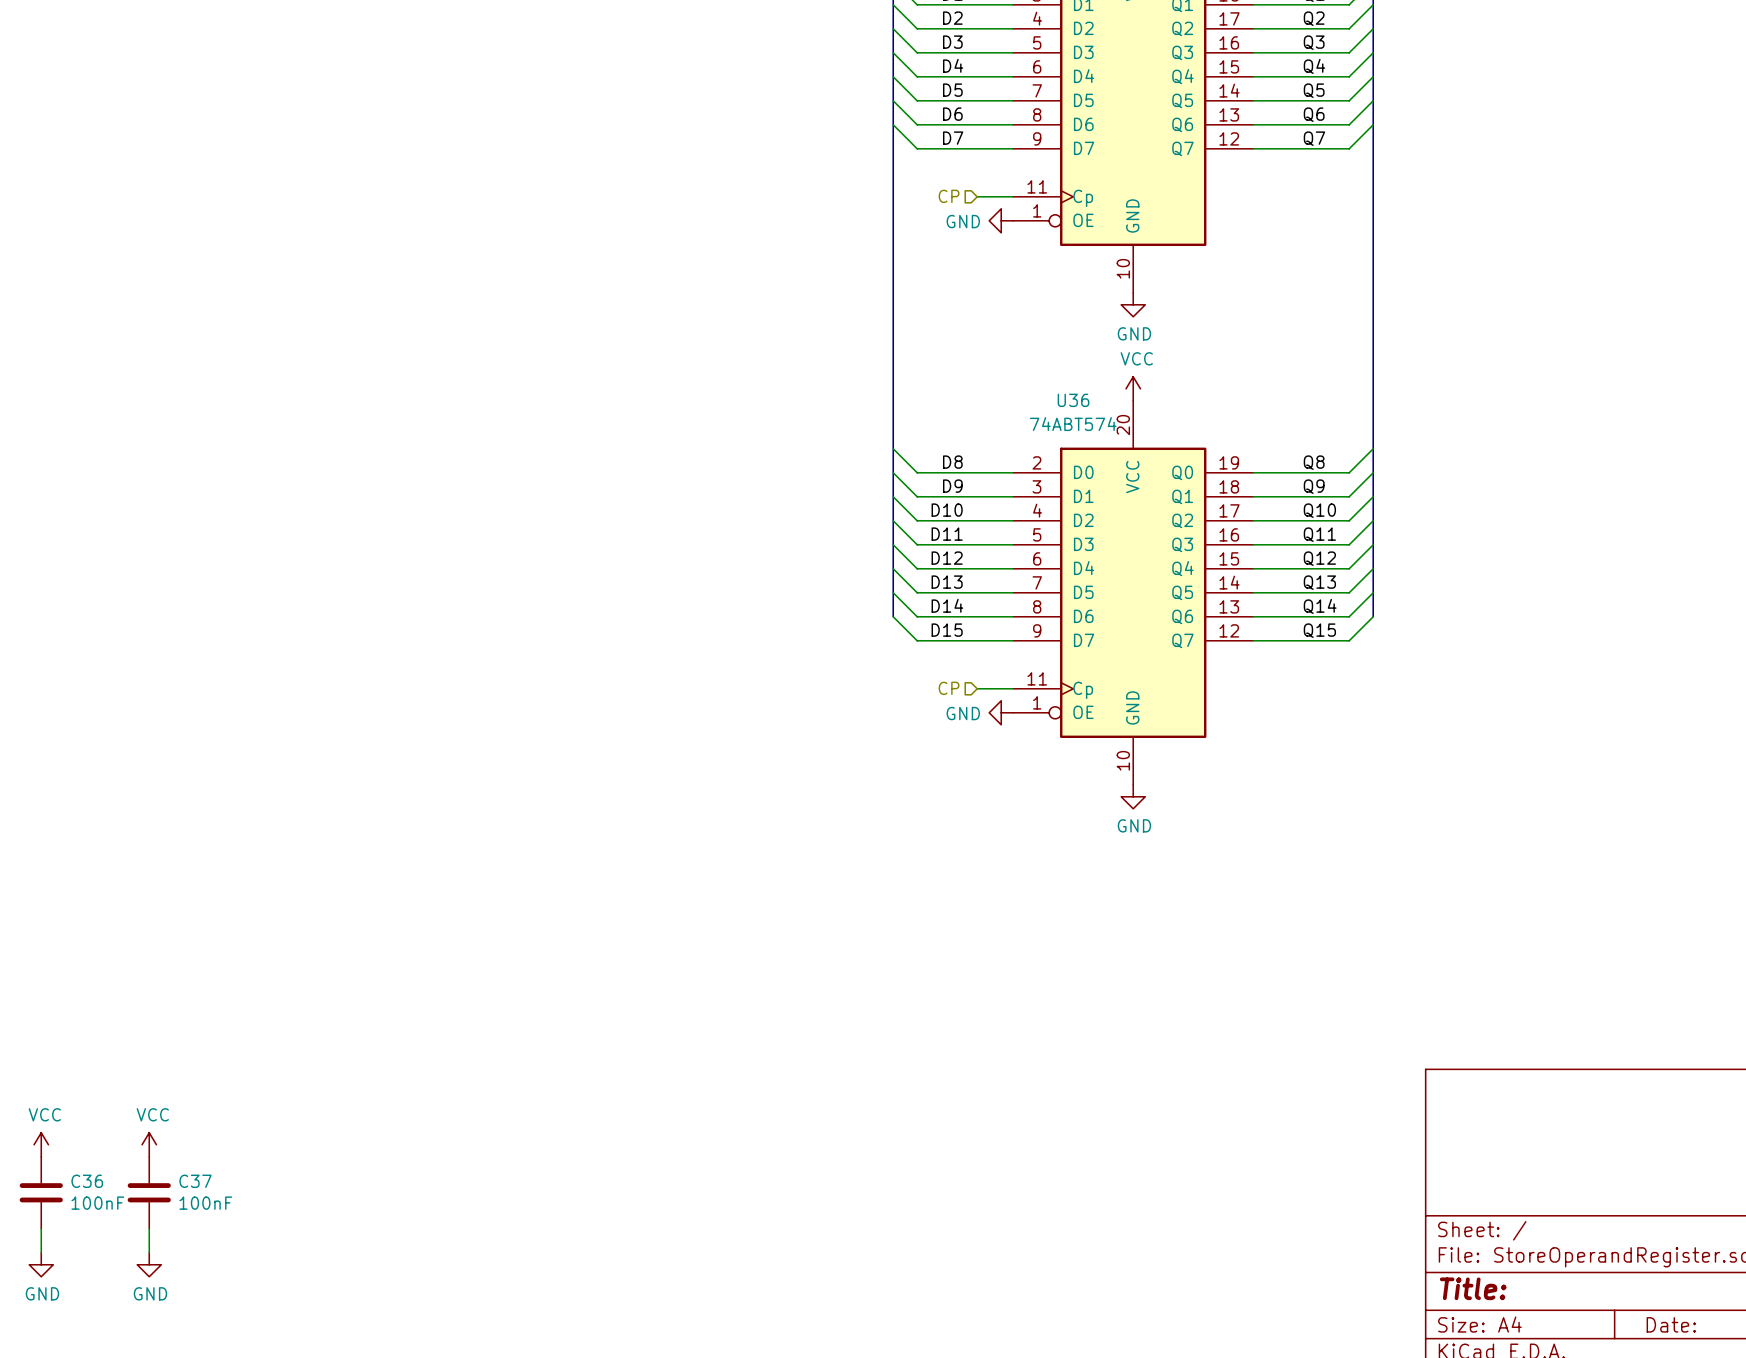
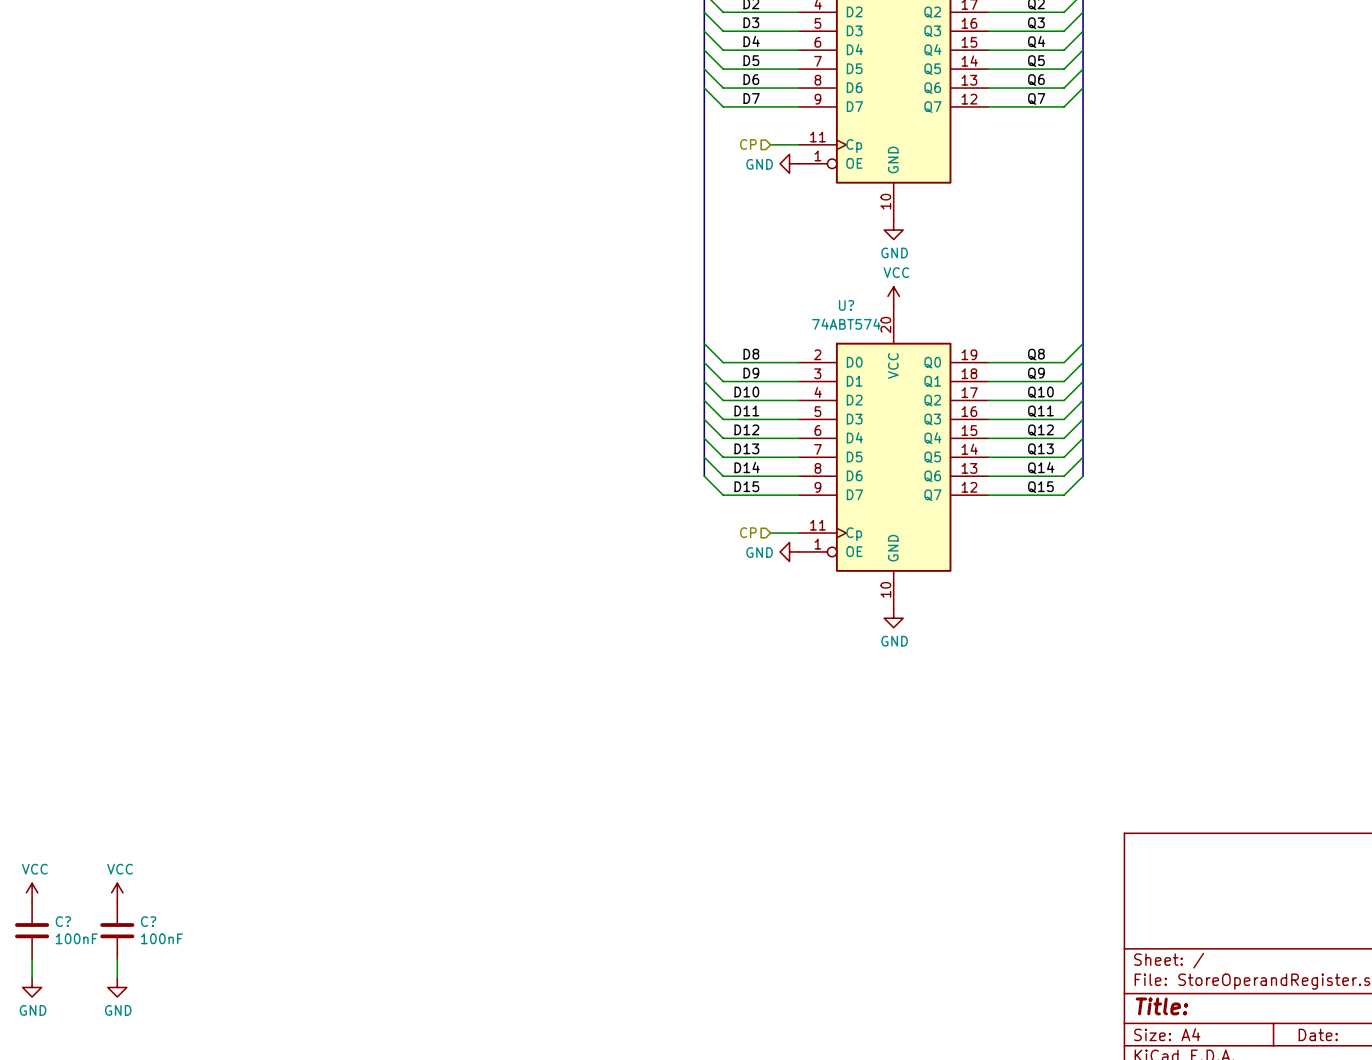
U36 name: U36 (1073, 400) -> U? (846, 305)
C36 name: C36 (87, 1181) -> C? (63, 921)
C37 name: C37 (195, 1181) -> C? (148, 921)

